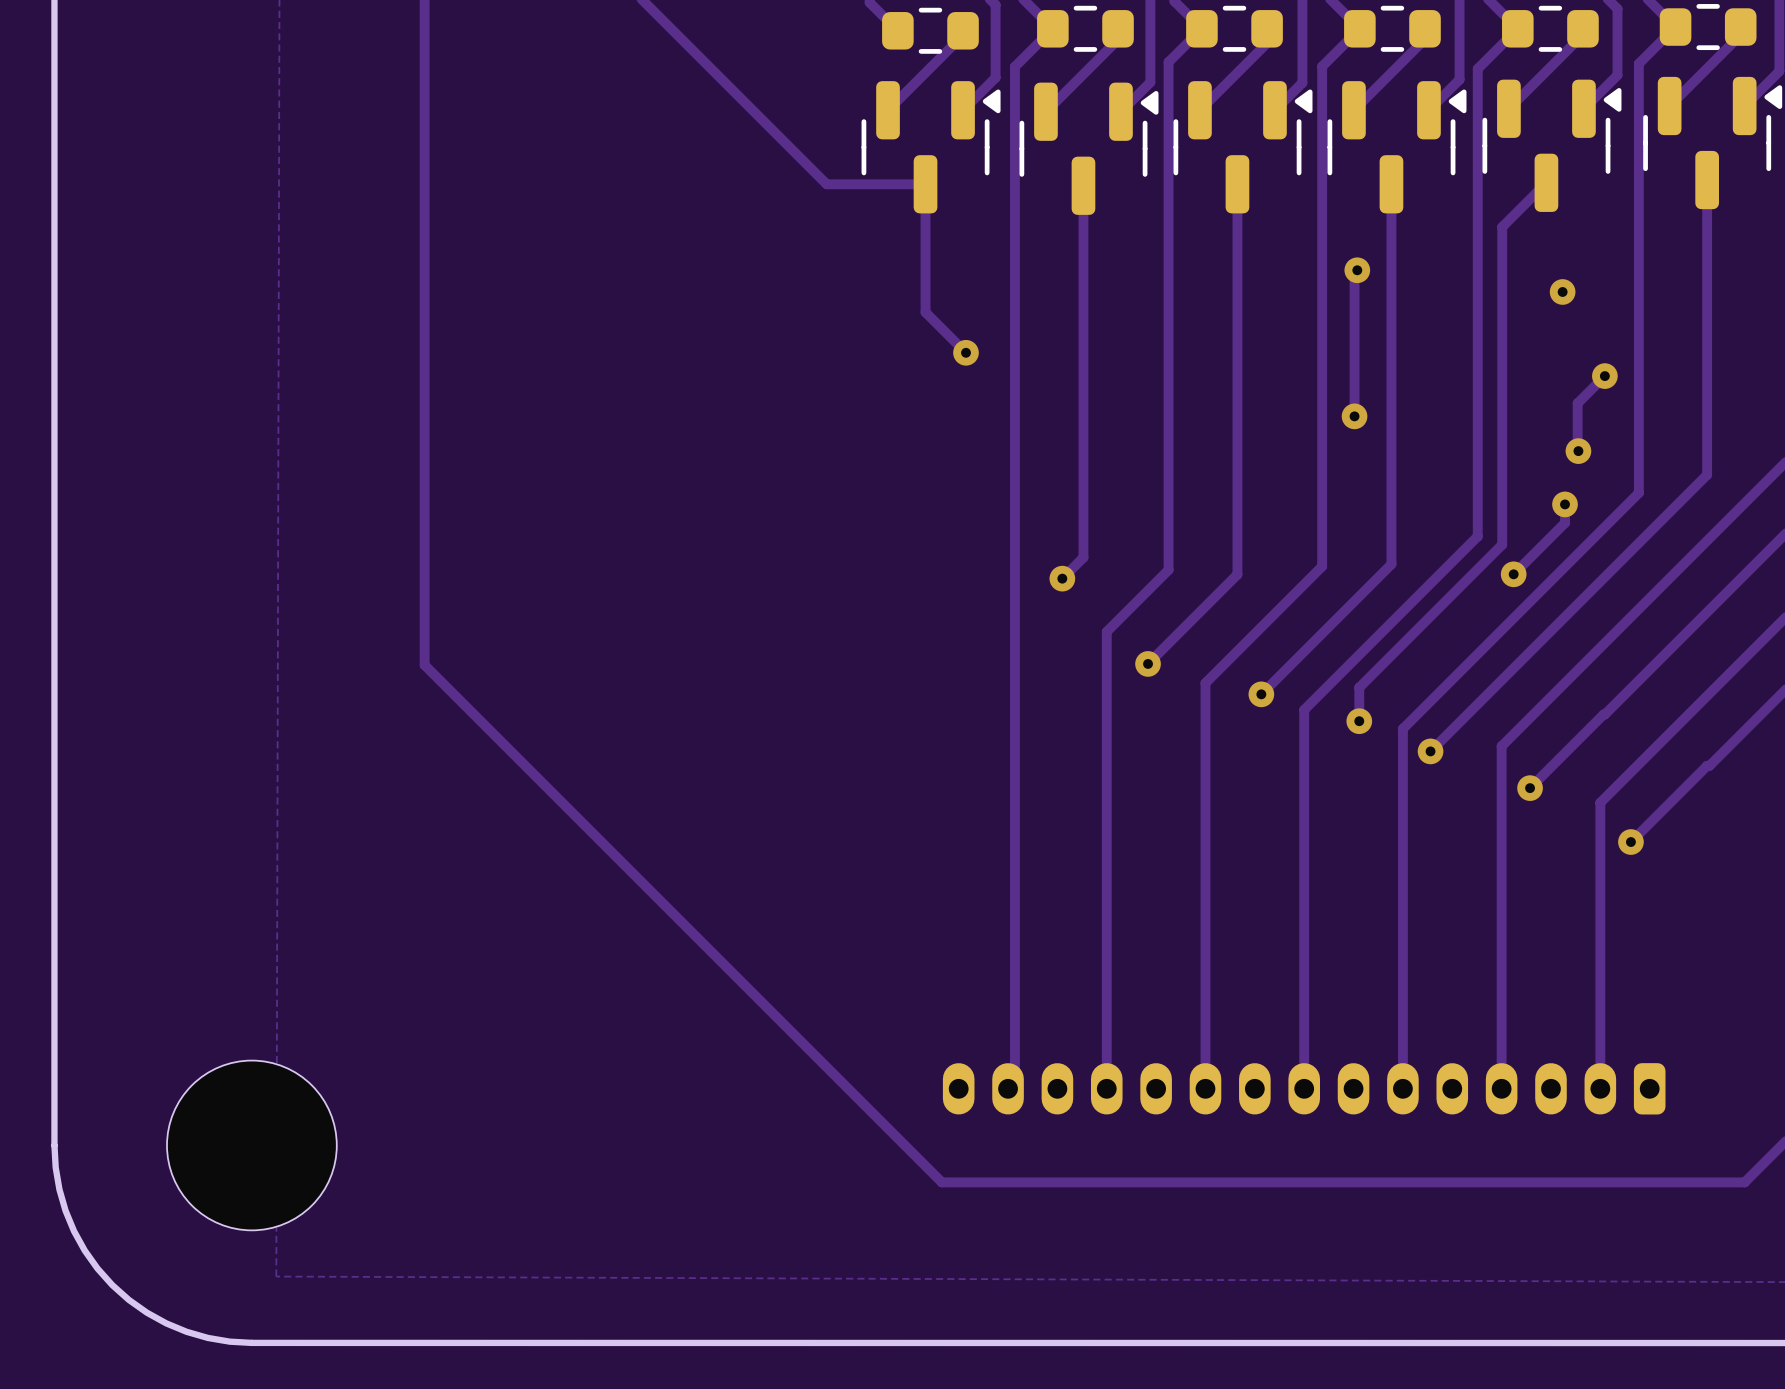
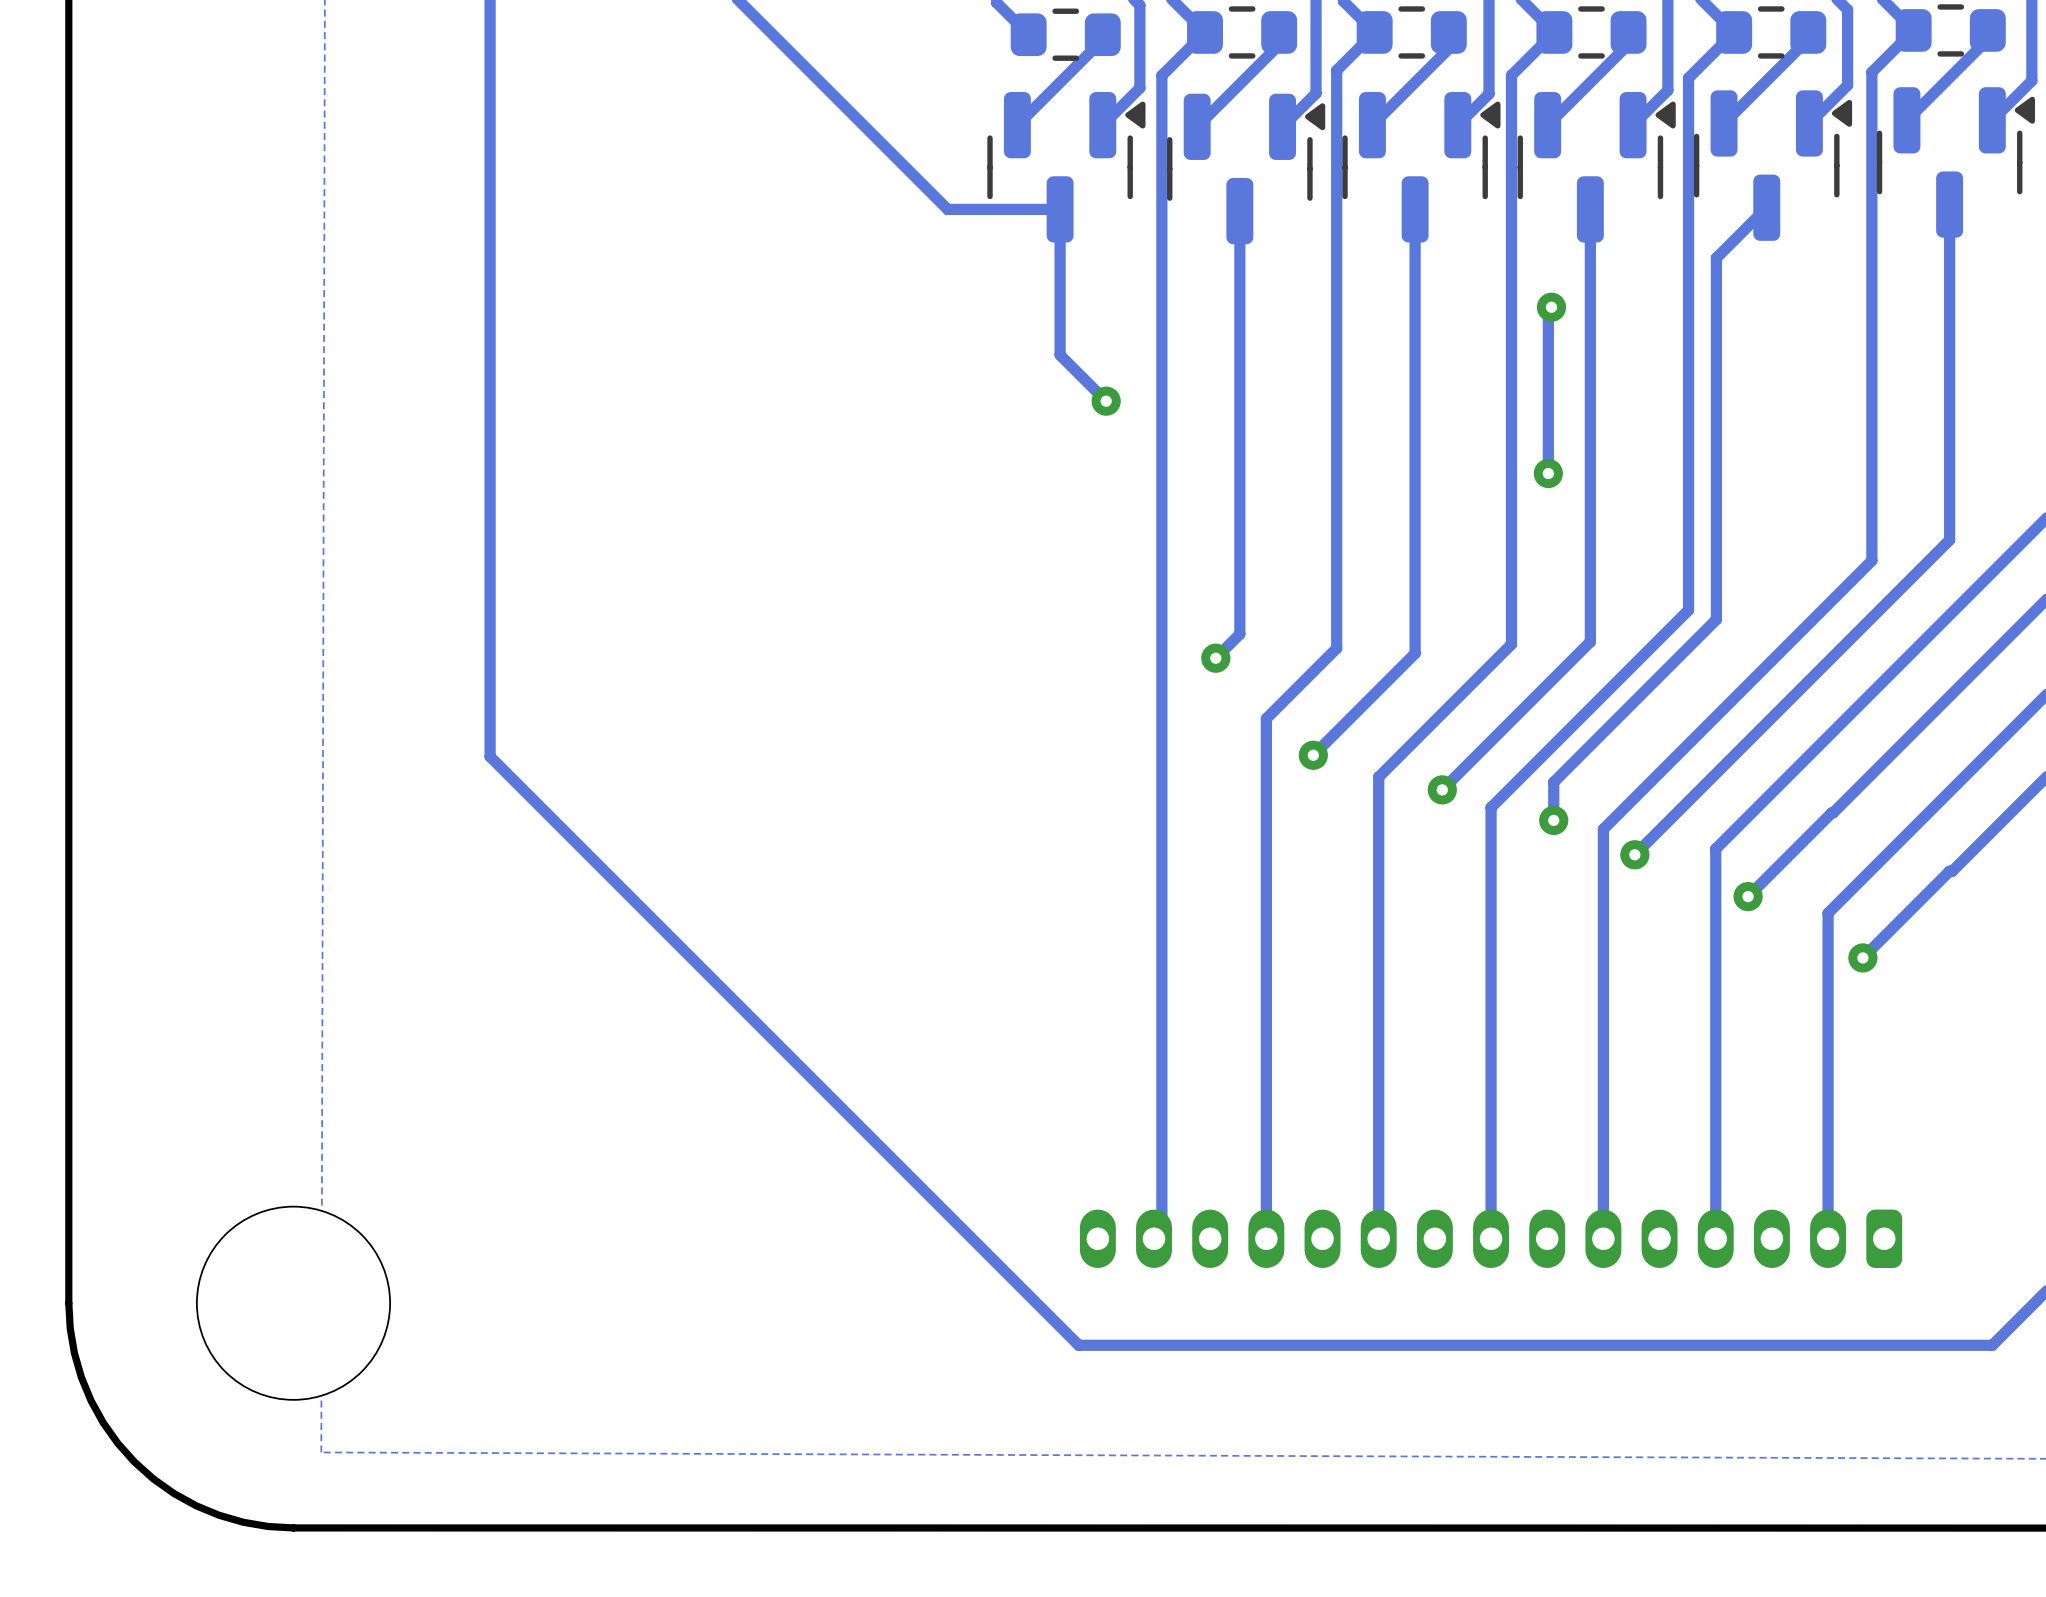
via: (1562, 291) -> none
track: (1604, 376) (1577, 403) (1578, 451) -> none
via: (1604, 376) -> none
via: (1578, 451) -> none
track: (1565, 504) (1565, 522) (1513, 574) -> none
via: (1565, 504) -> none
via: (1513, 574) -> none

